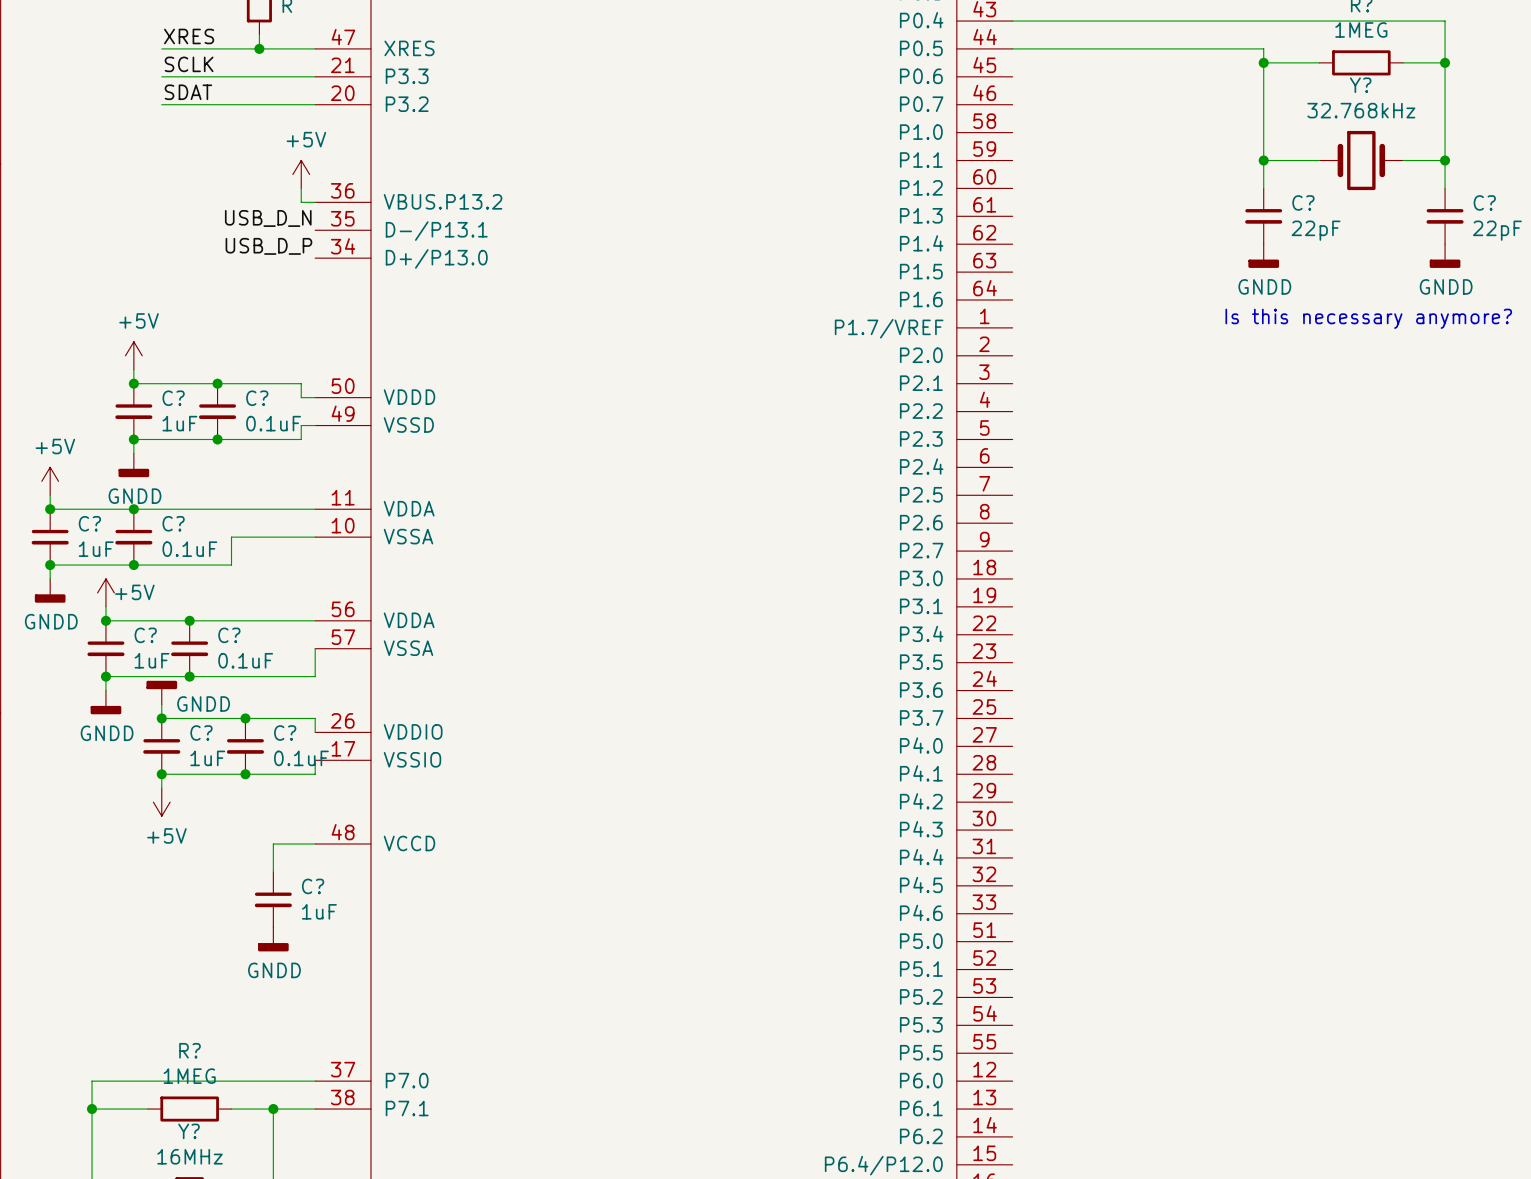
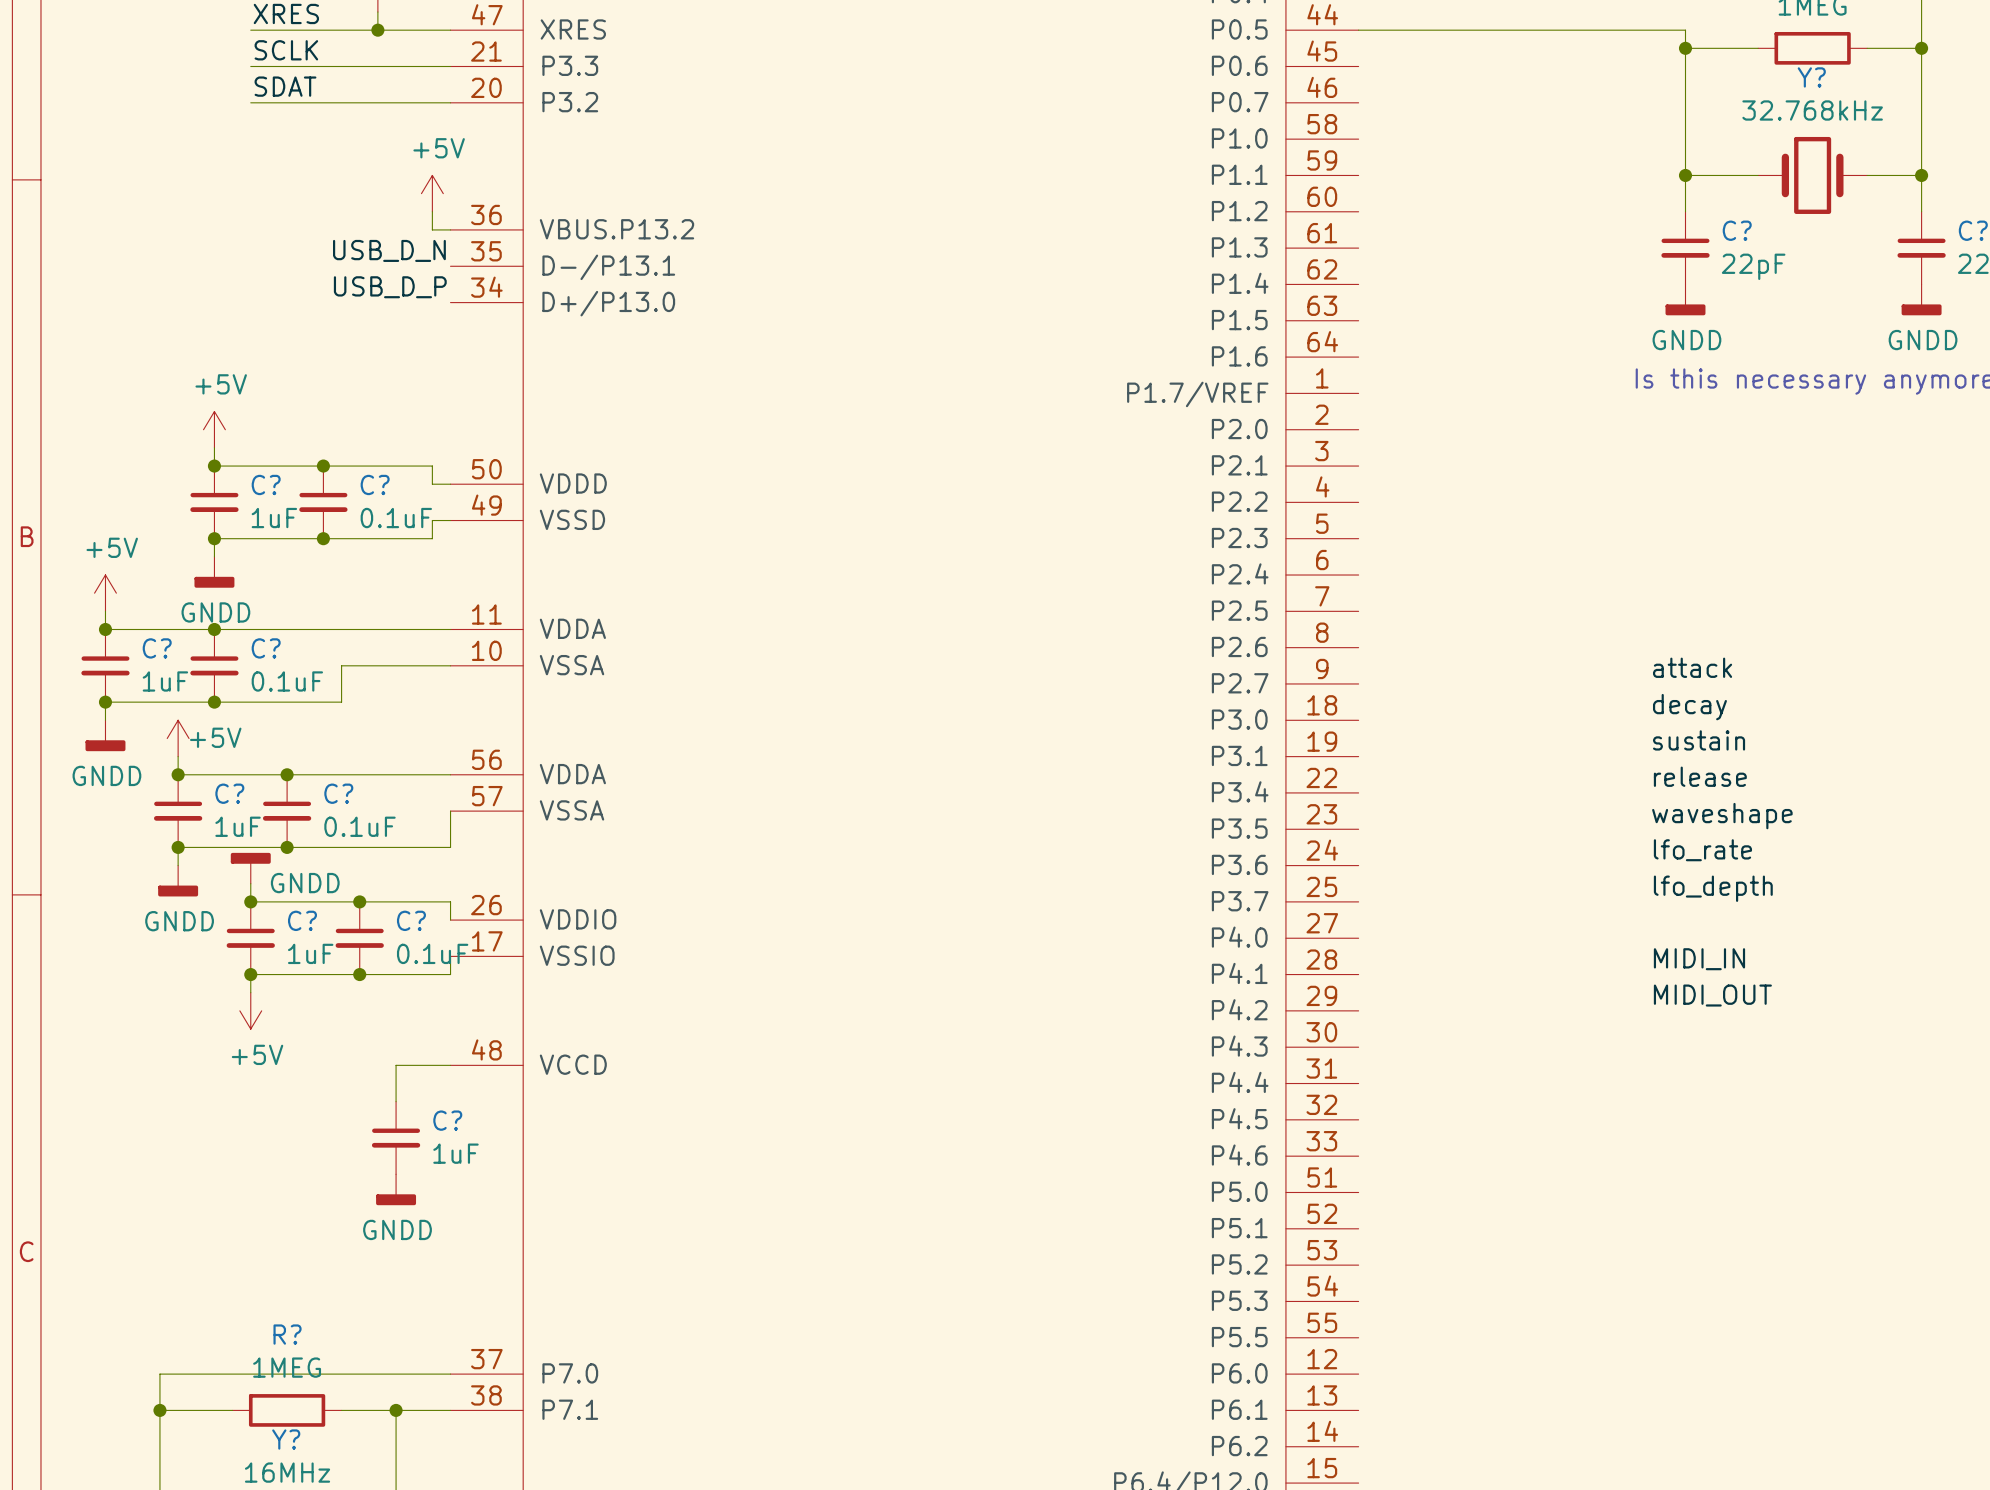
label: none -> attack (1692, 667)
label: none -> decay (1689, 707)
label: none -> sustain (1699, 740)
label: none -> release (1700, 776)
label: none -> waveshape (1722, 816)
label: none -> lfo_rate (1702, 850)
label: none -> lfo_depth (1713, 888)
label: none -> MIDI_IN (1699, 959)
label: none -> MIDI_OUT (1712, 995)

